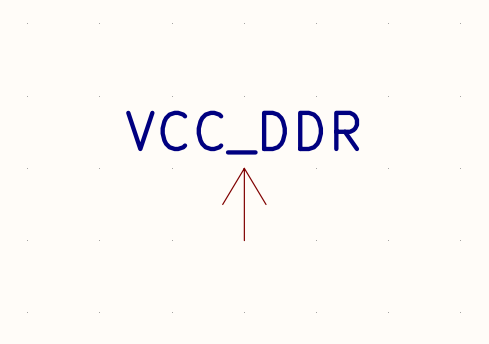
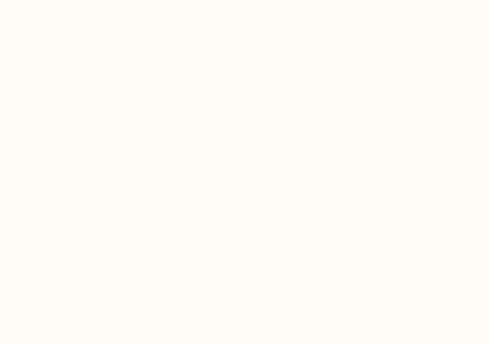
power symbol: VCC_DDR (244, 204) -> none

